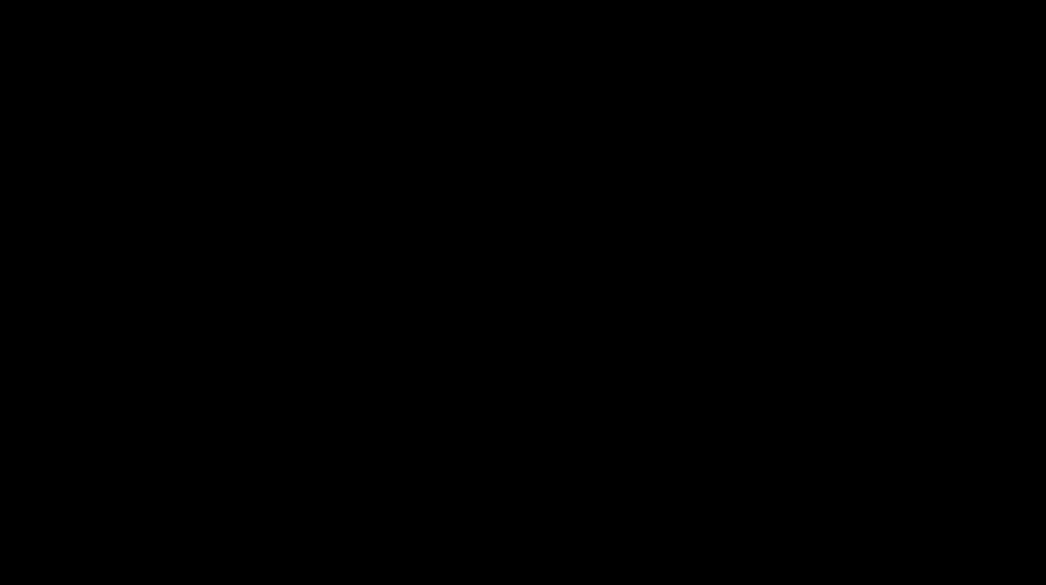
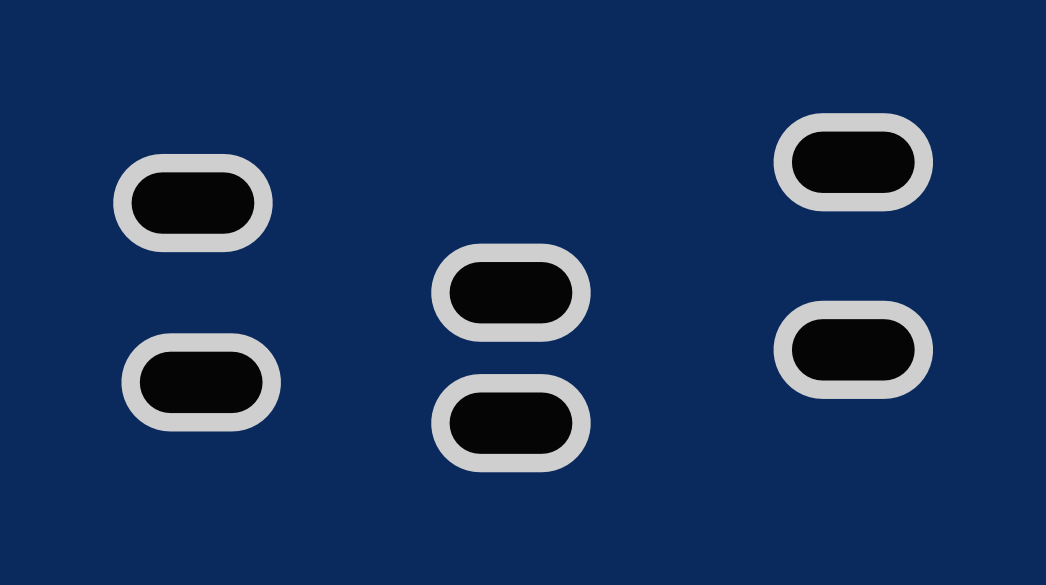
part: none -> (853, 162)
part: none -> (192, 203)
part: none -> (510, 292)
part: none -> (853, 349)
part: none -> (201, 382)
part: none -> (510, 423)

